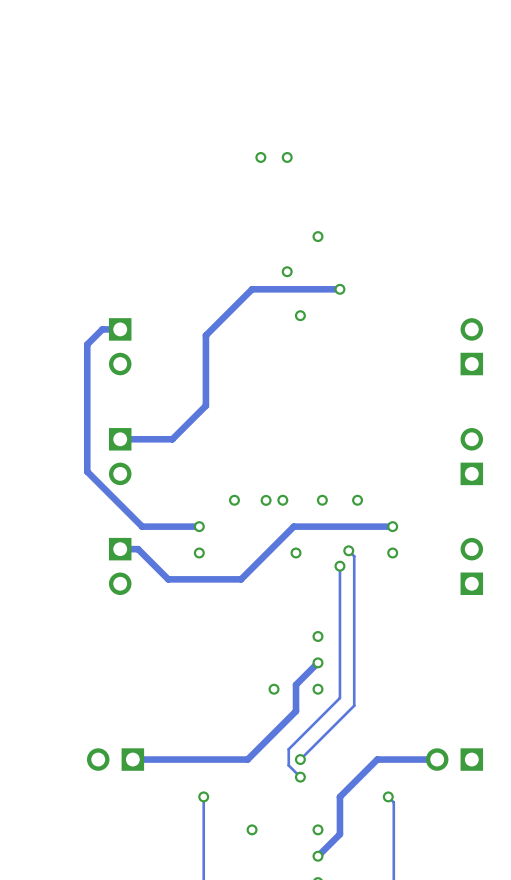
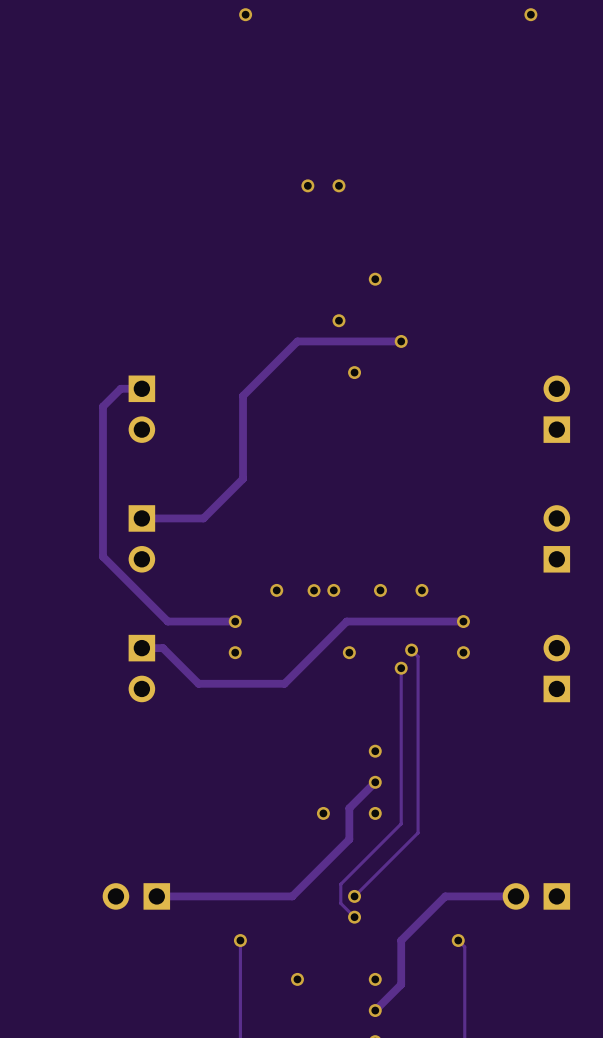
via: none -> (245, 14)
via: none -> (530, 14)

